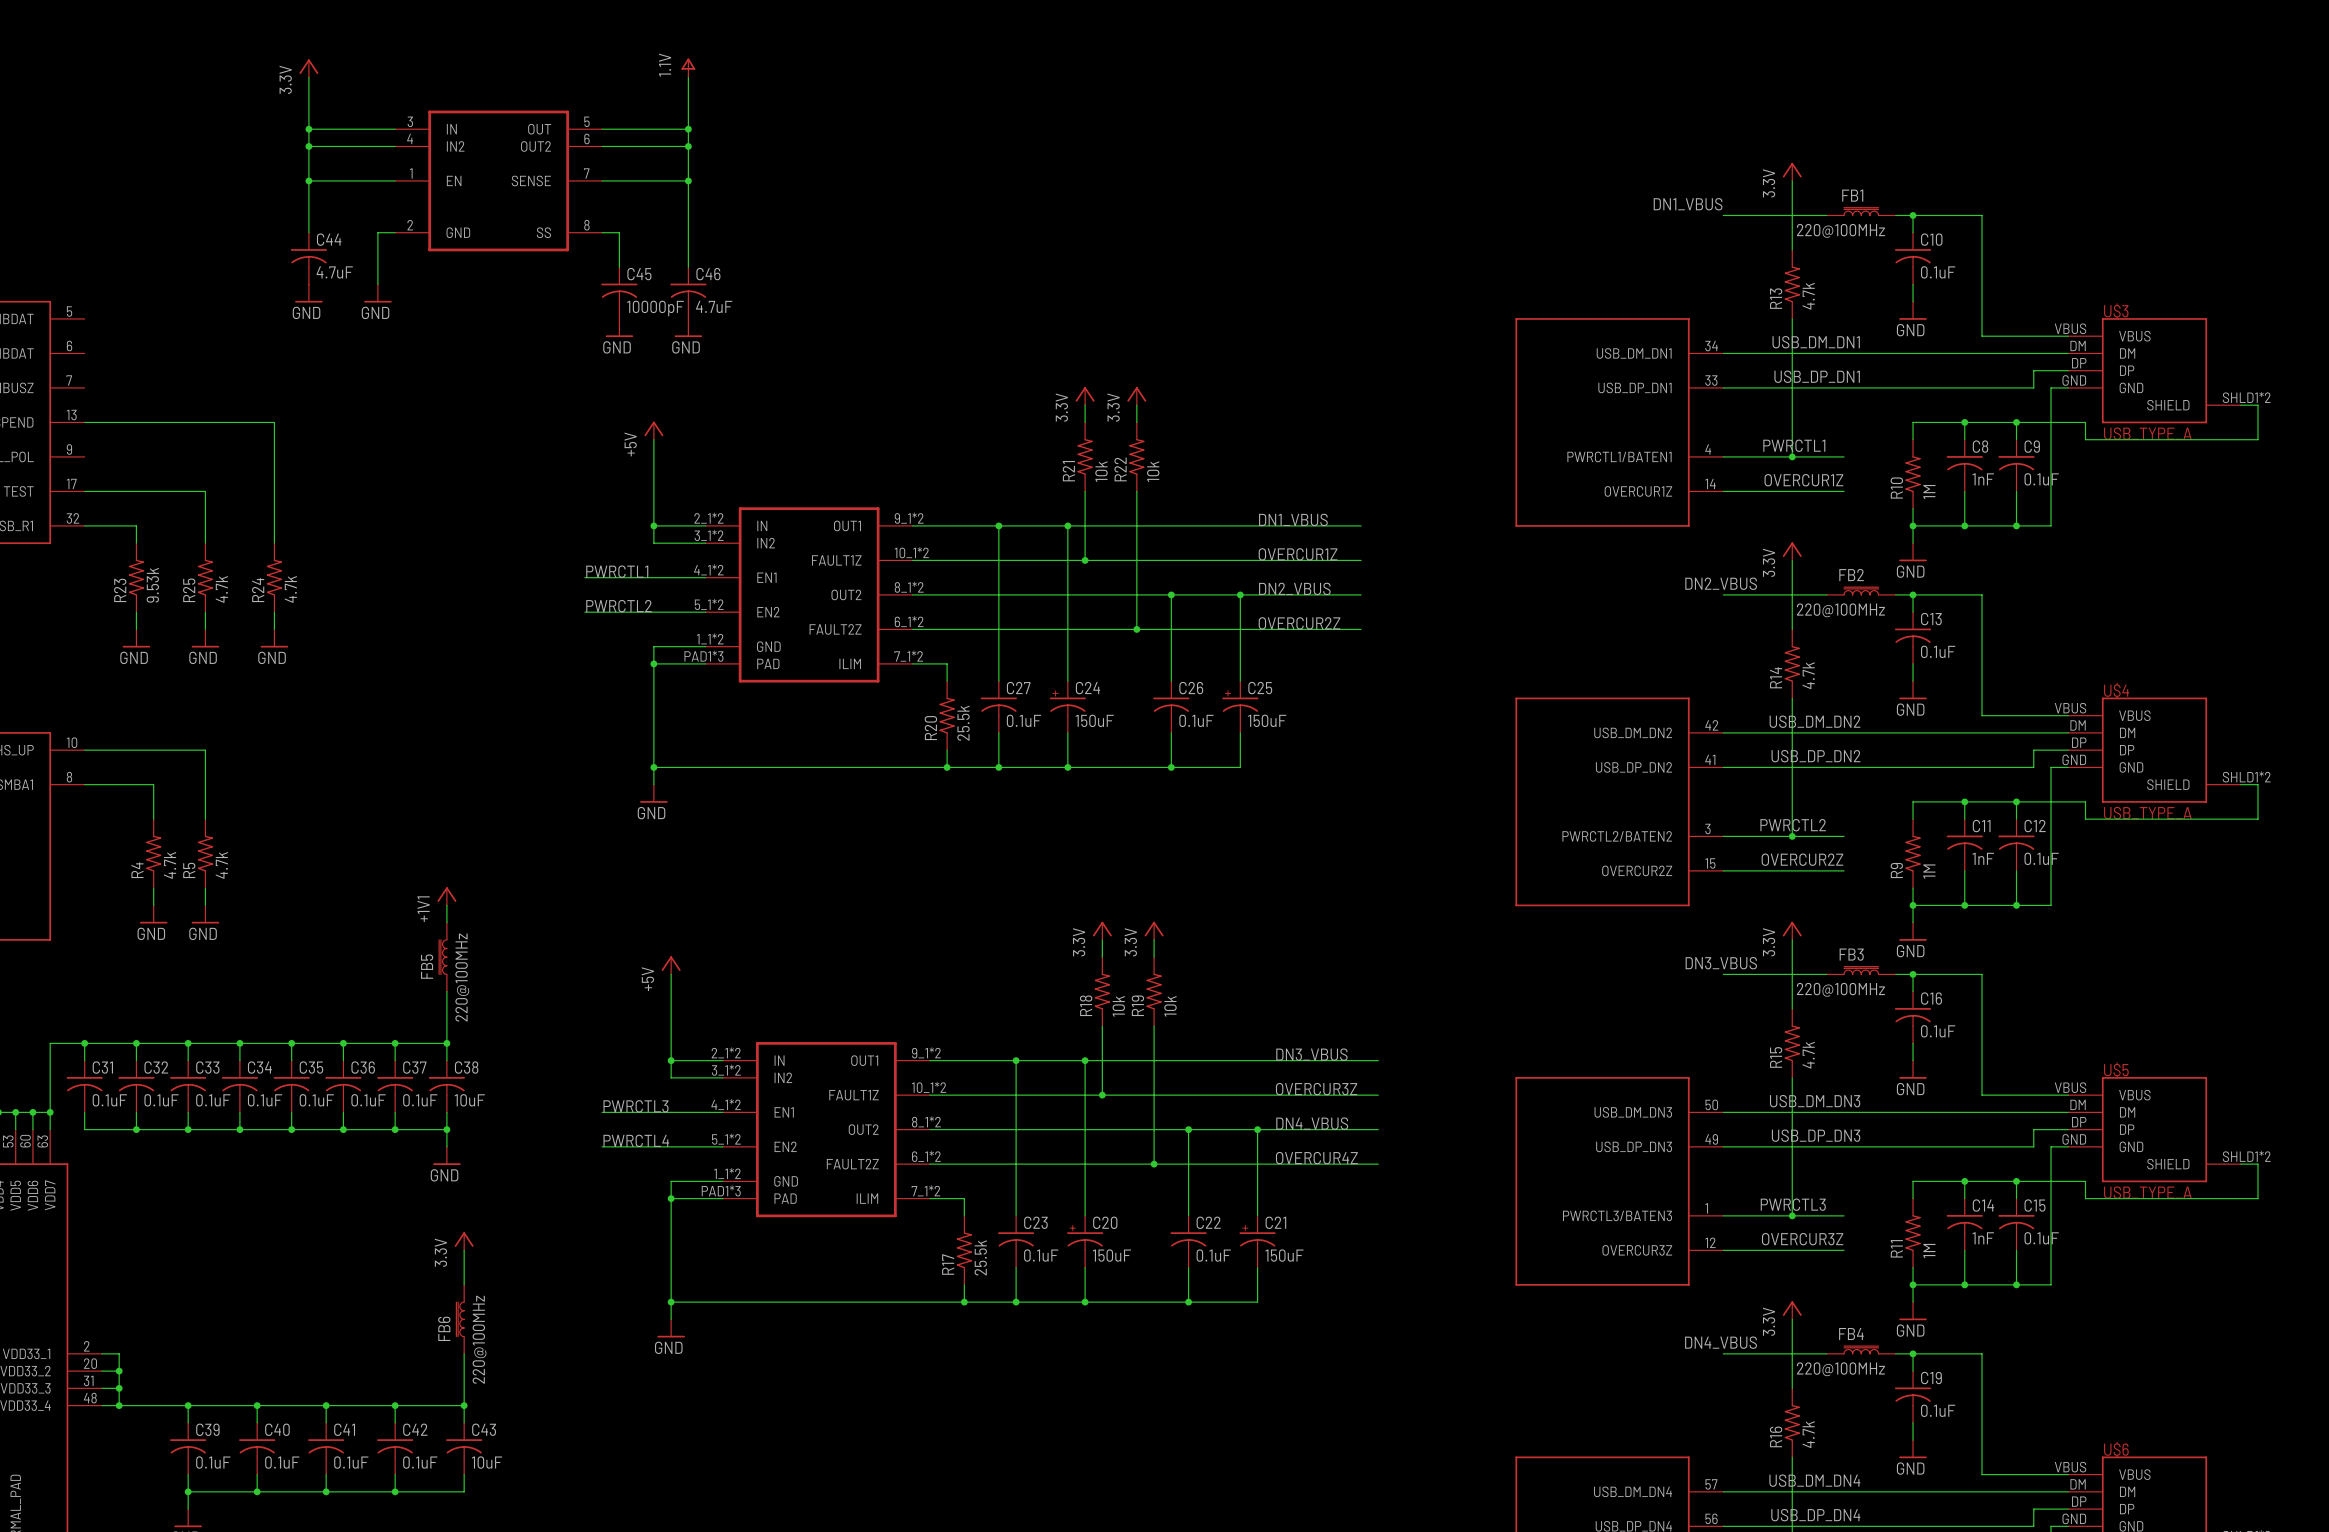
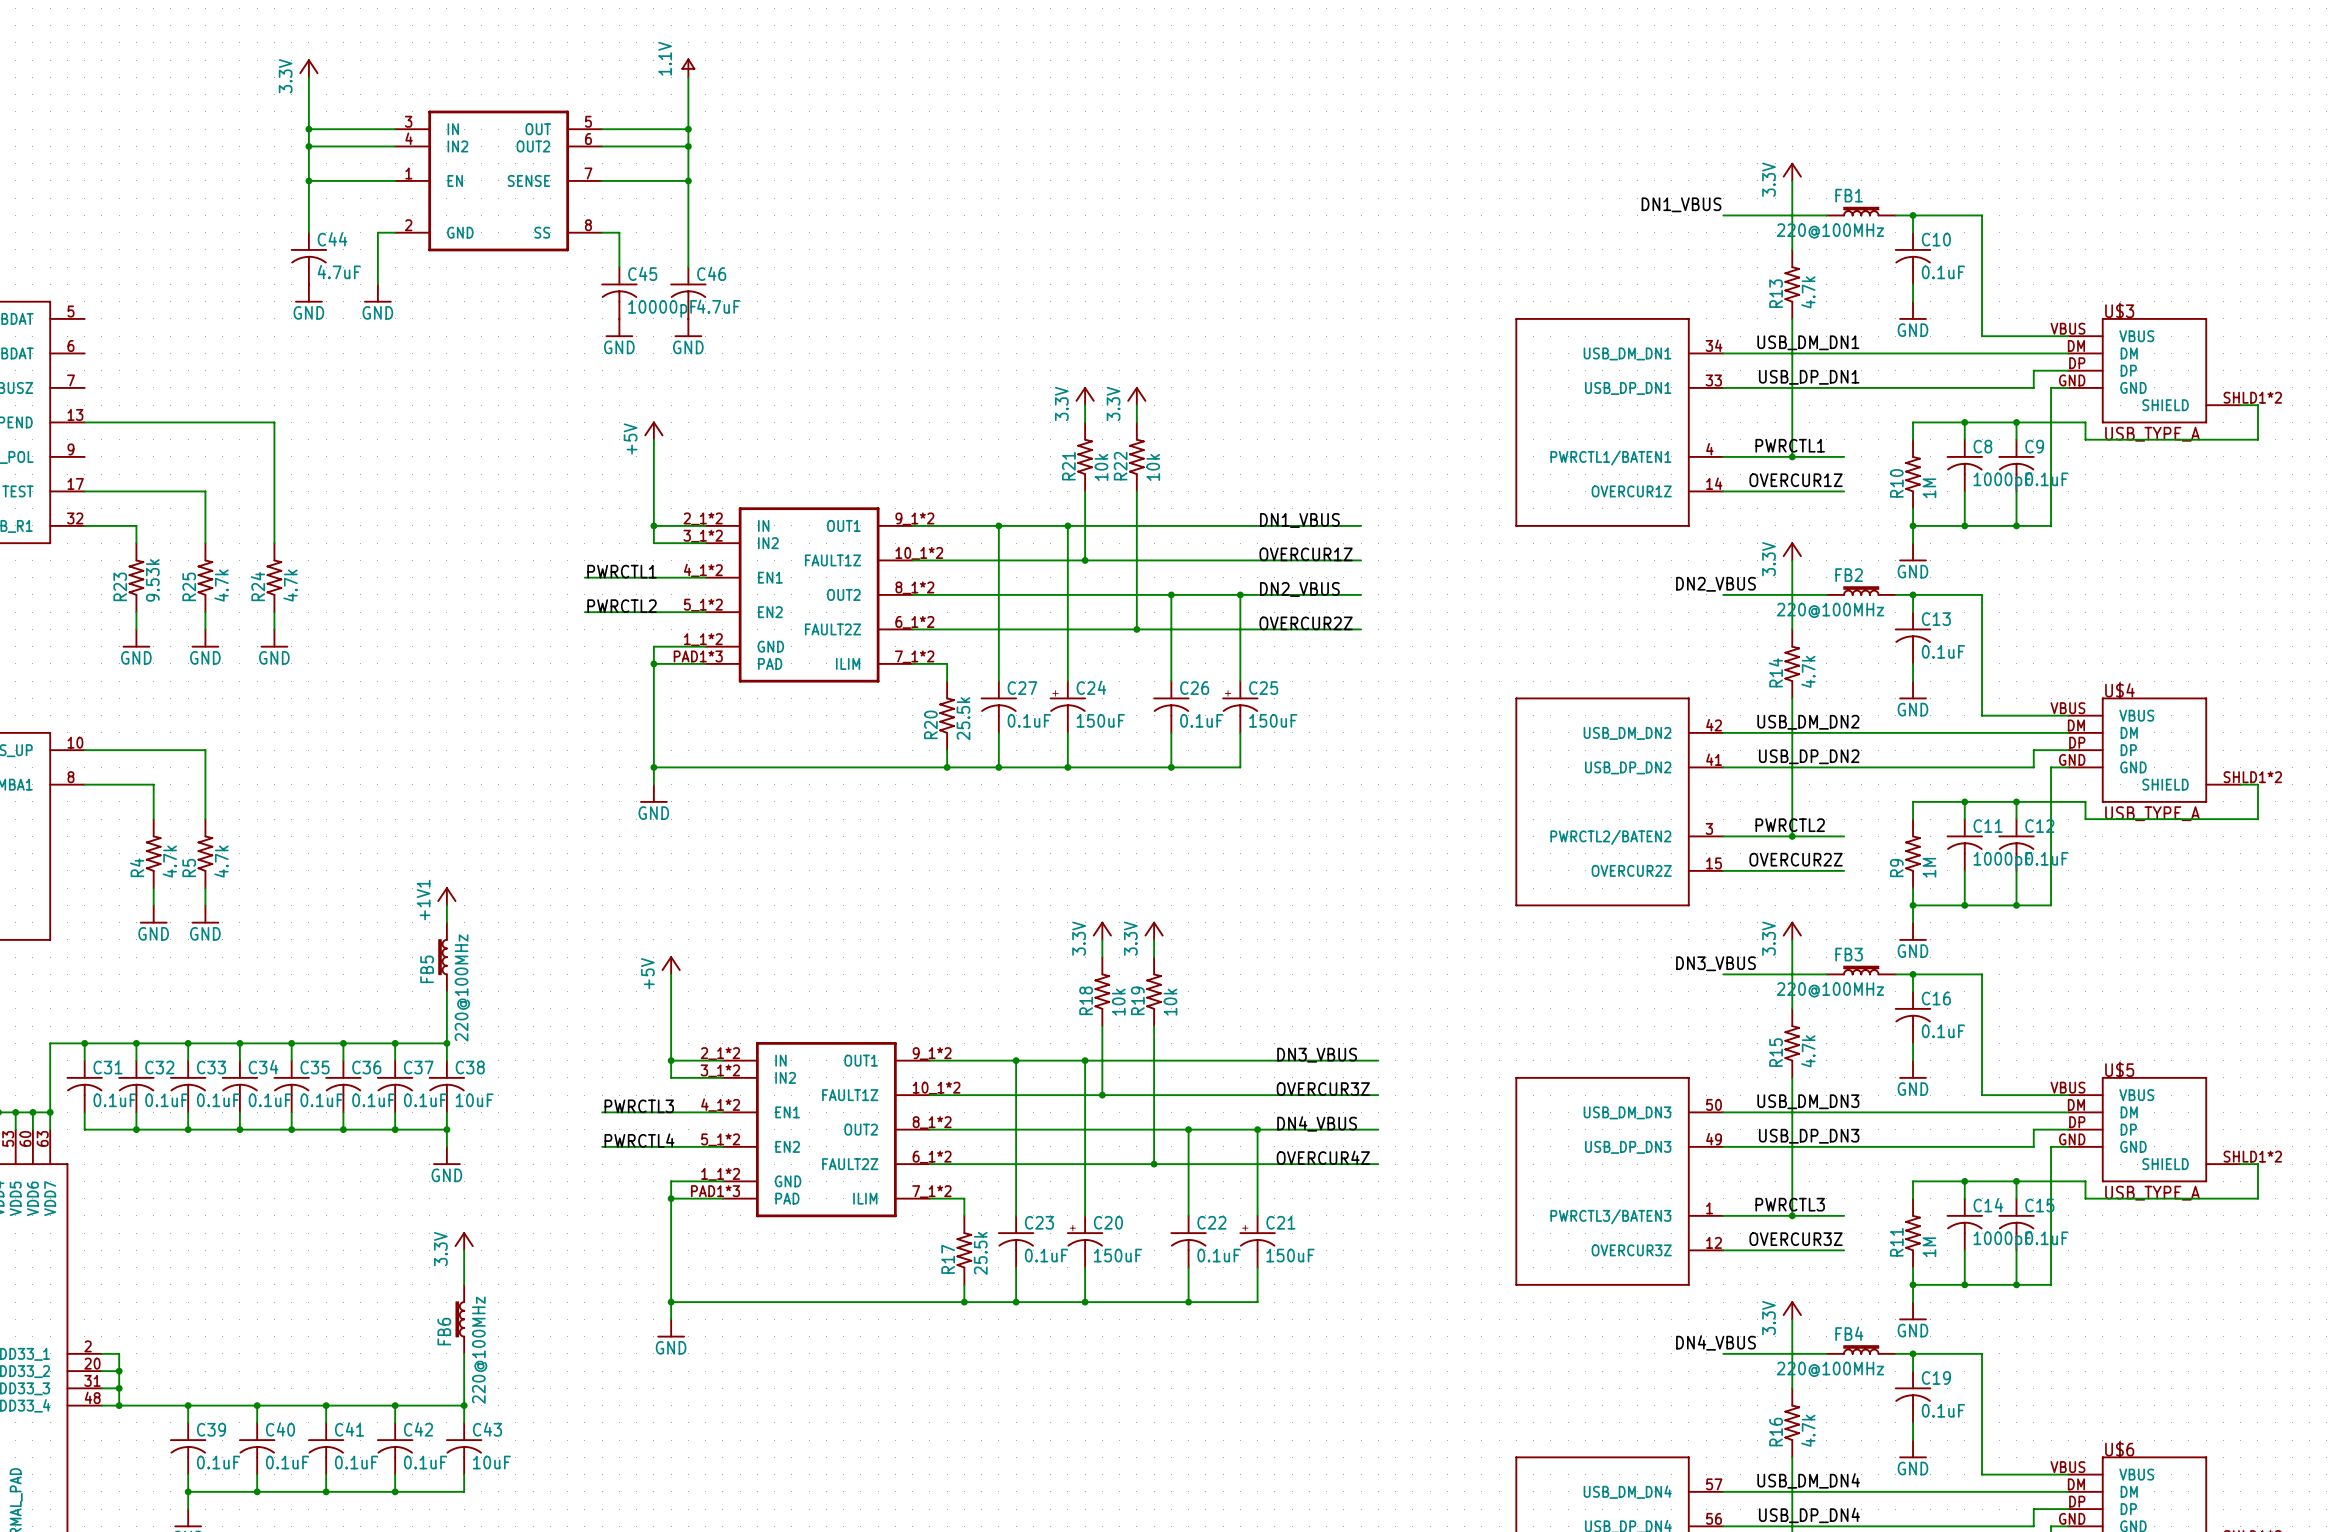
C8 value: 1nF (1983, 479) -> 1000pF (2002, 481)
C11 value: 1nF (1983, 858) -> 1000pF (2002, 860)
C14 value: 1nF (1983, 1238) -> 1000pF (2002, 1240)

